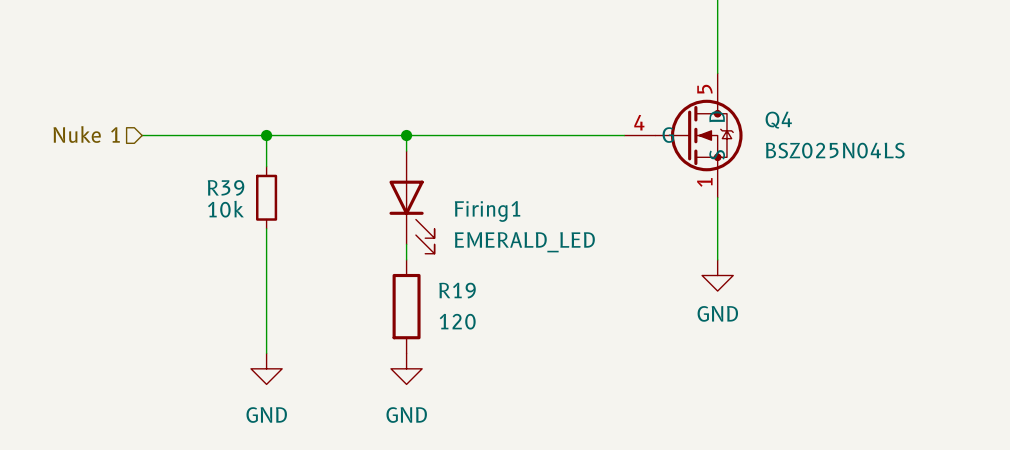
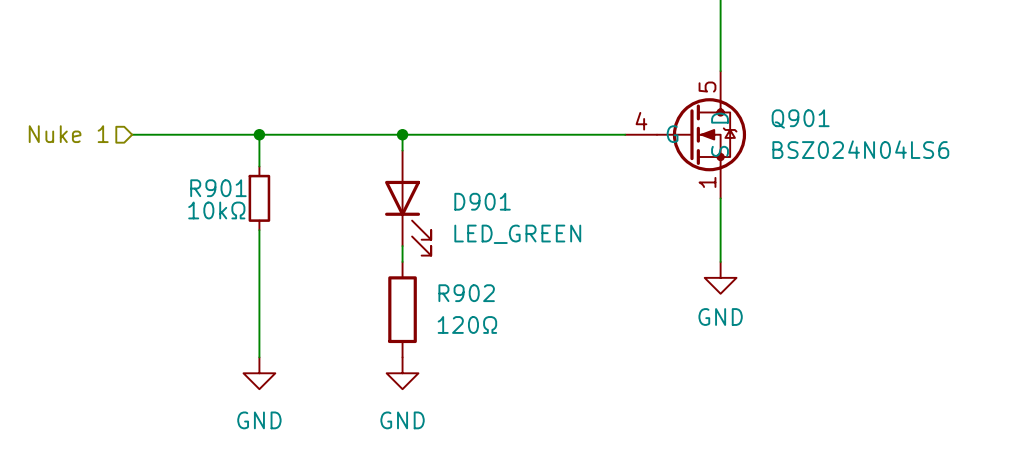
Q4 name: Q4 (778, 120) -> Q901 (800, 118)
Q4 value: BSZ025N04LS (835, 150) -> BSZ024N04LS6 (860, 149)
R39 name: R39 (226, 187) -> R901 (218, 188)
R39 value: 10k (225, 209) -> 10kΩ (216, 210)
Firing1 name: Firing1 (487, 211) -> D901 (482, 201)
Firing1 value: EMERALD_LED (524, 242) -> LED_GREEN (517, 234)
R19 name: R19 (457, 290) -> R902 (466, 293)
R19 value: 120 (457, 321) -> 120Ω (467, 324)

